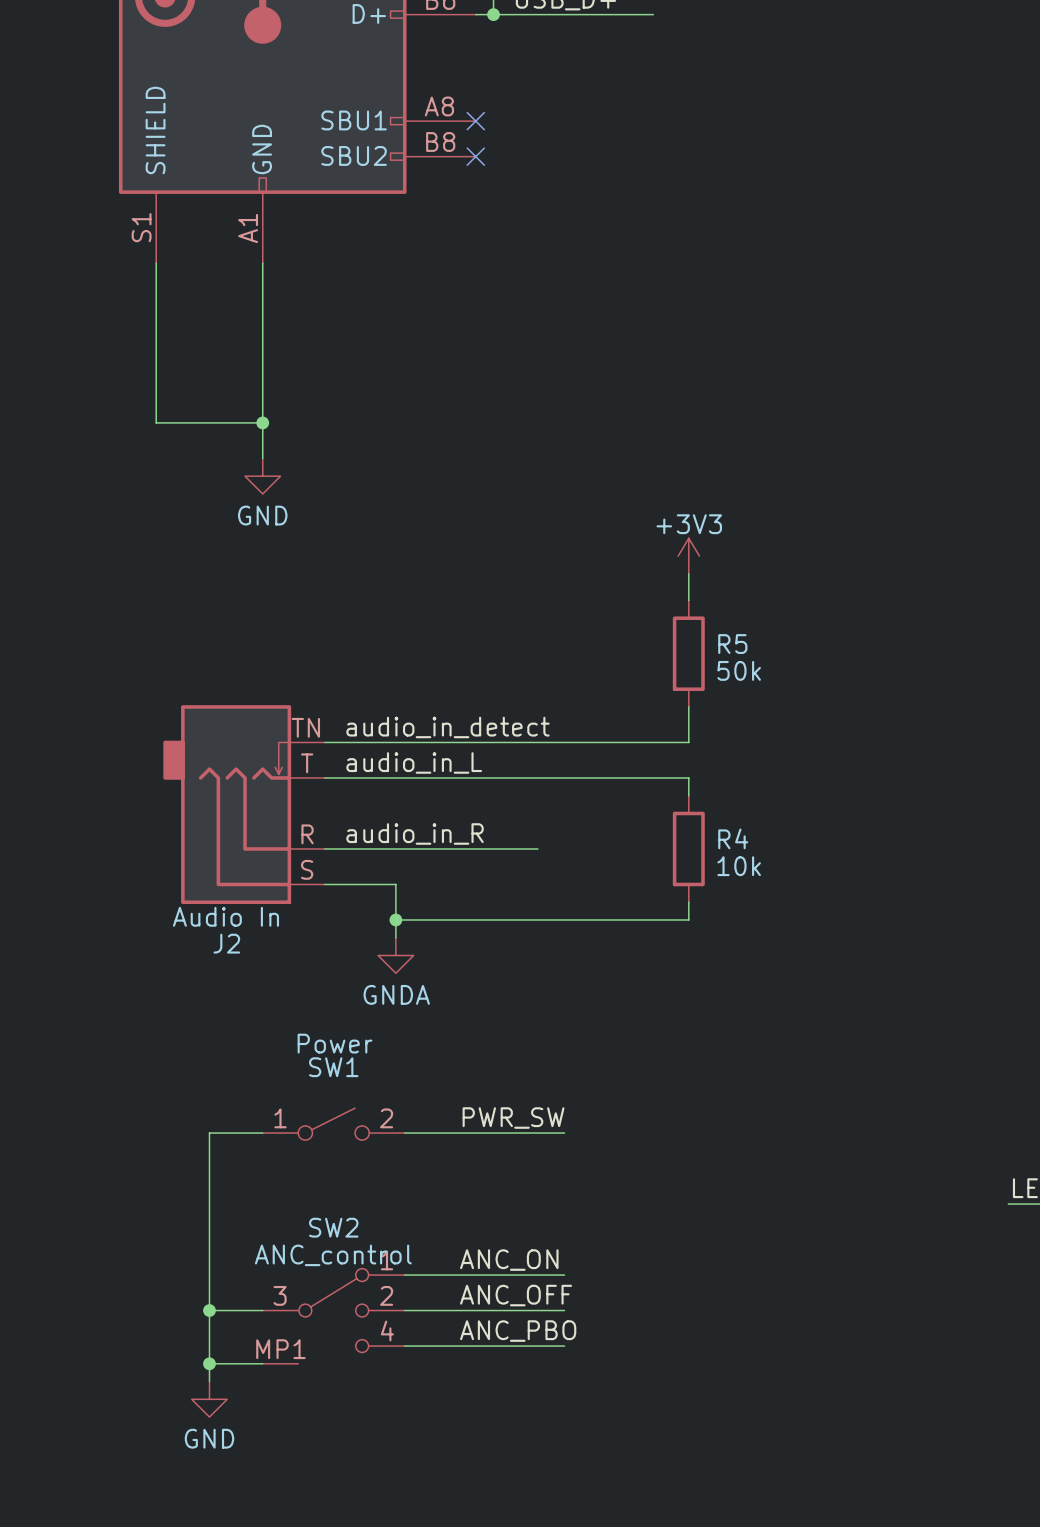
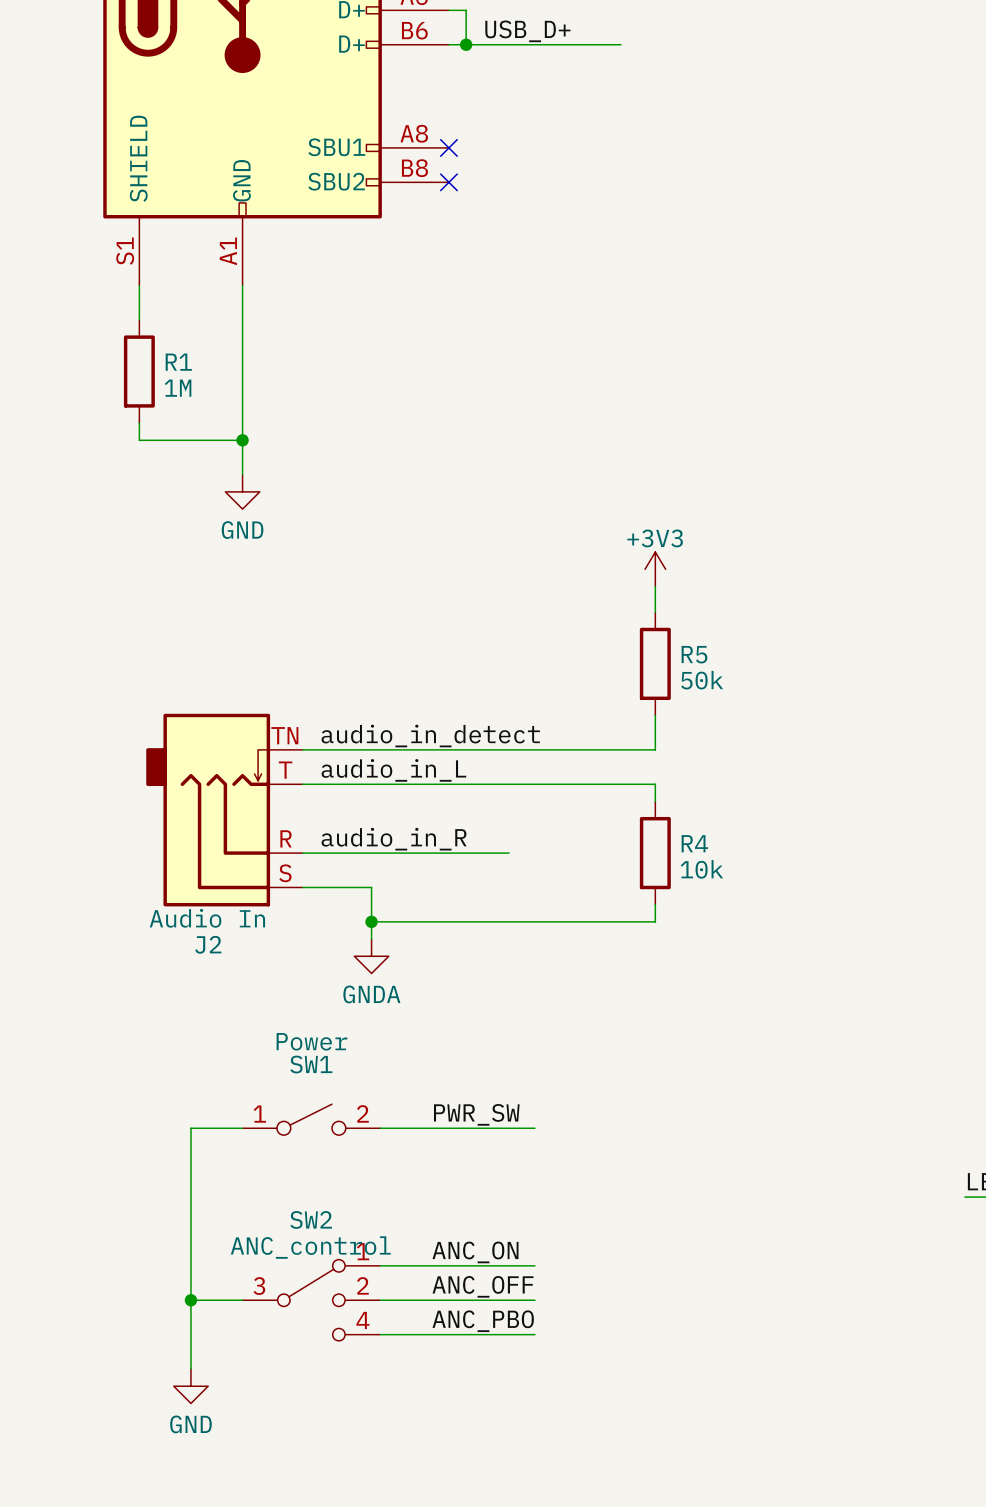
wire: (156, 298) (156, 405) -> none
R1: none -> 1M (139, 371)
SW2 symbol: [262, 1268, 405, 1364] -> [242, 1259, 381, 1341]
wire: (209, 1363) (262, 1363) -> none
junction: (209, 1363) -> none

